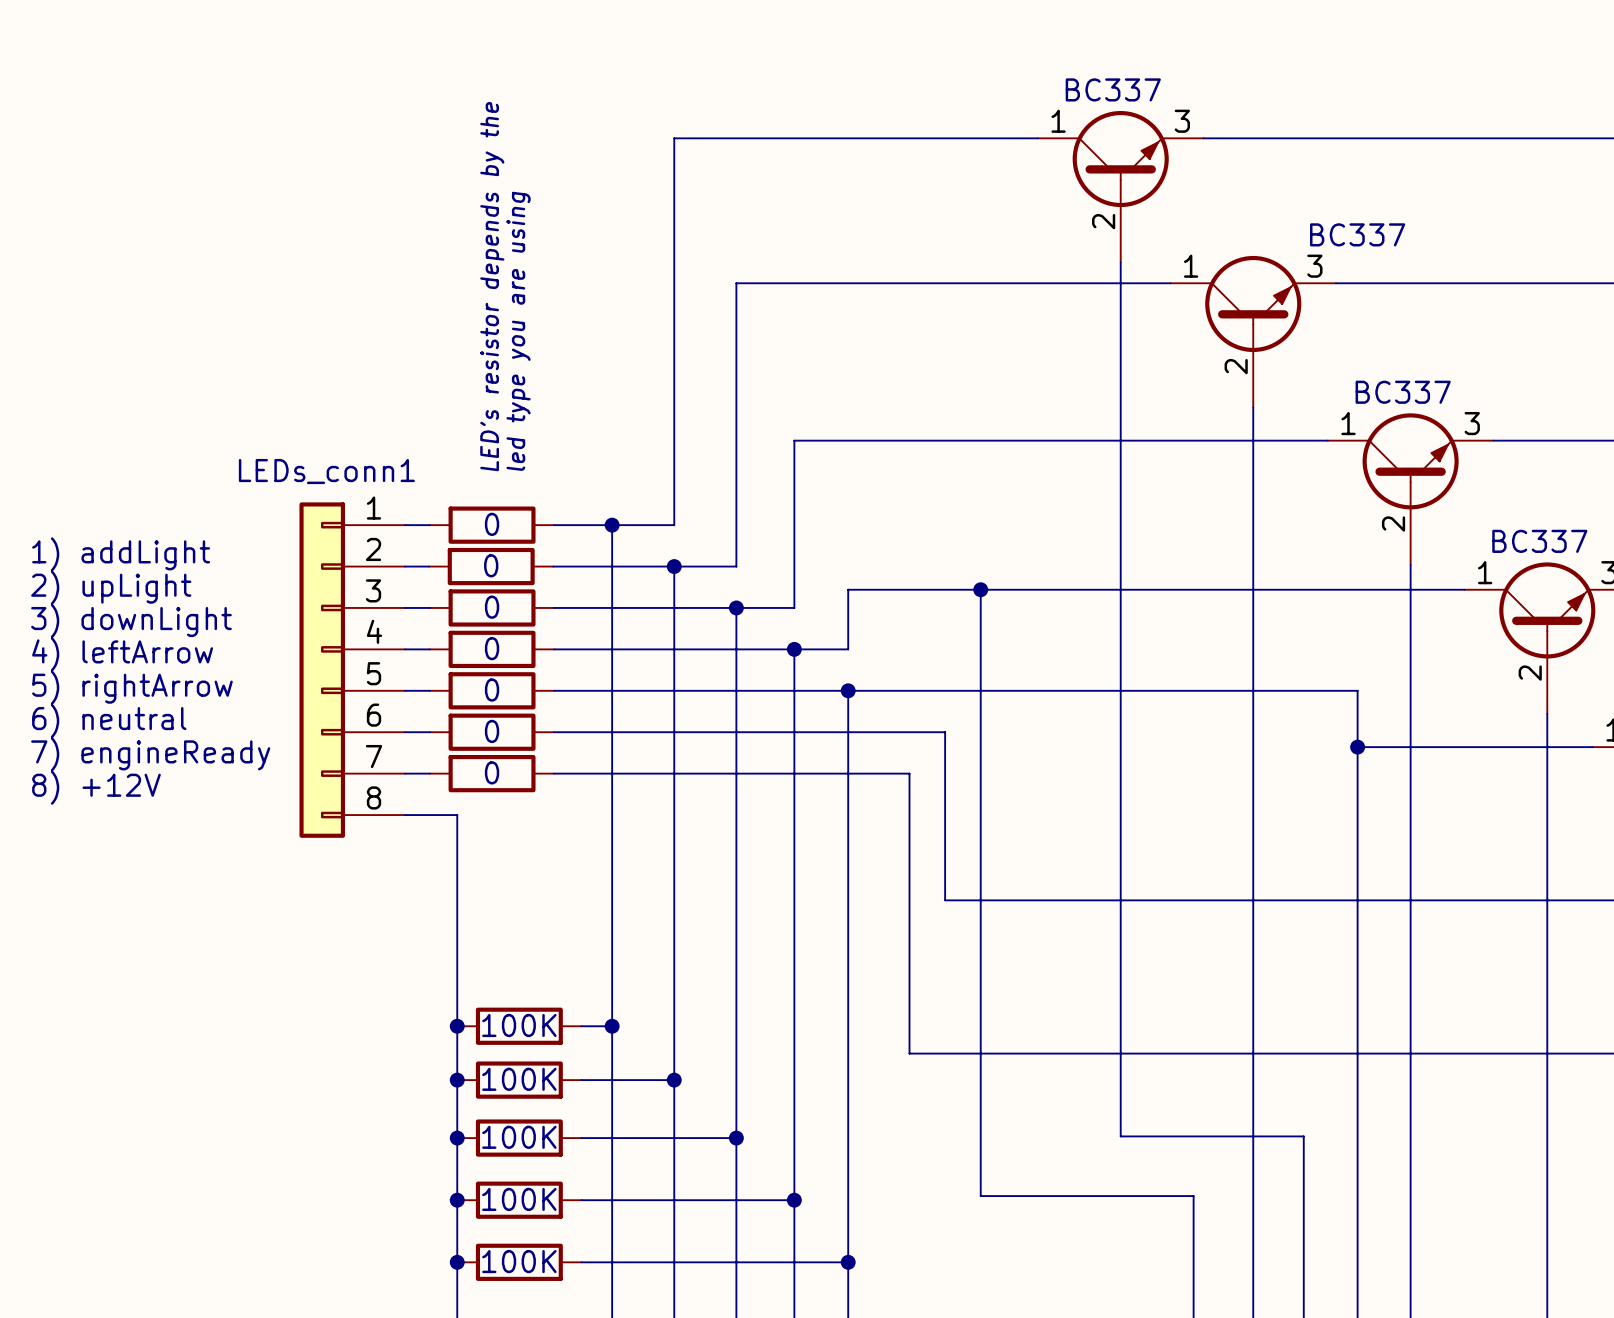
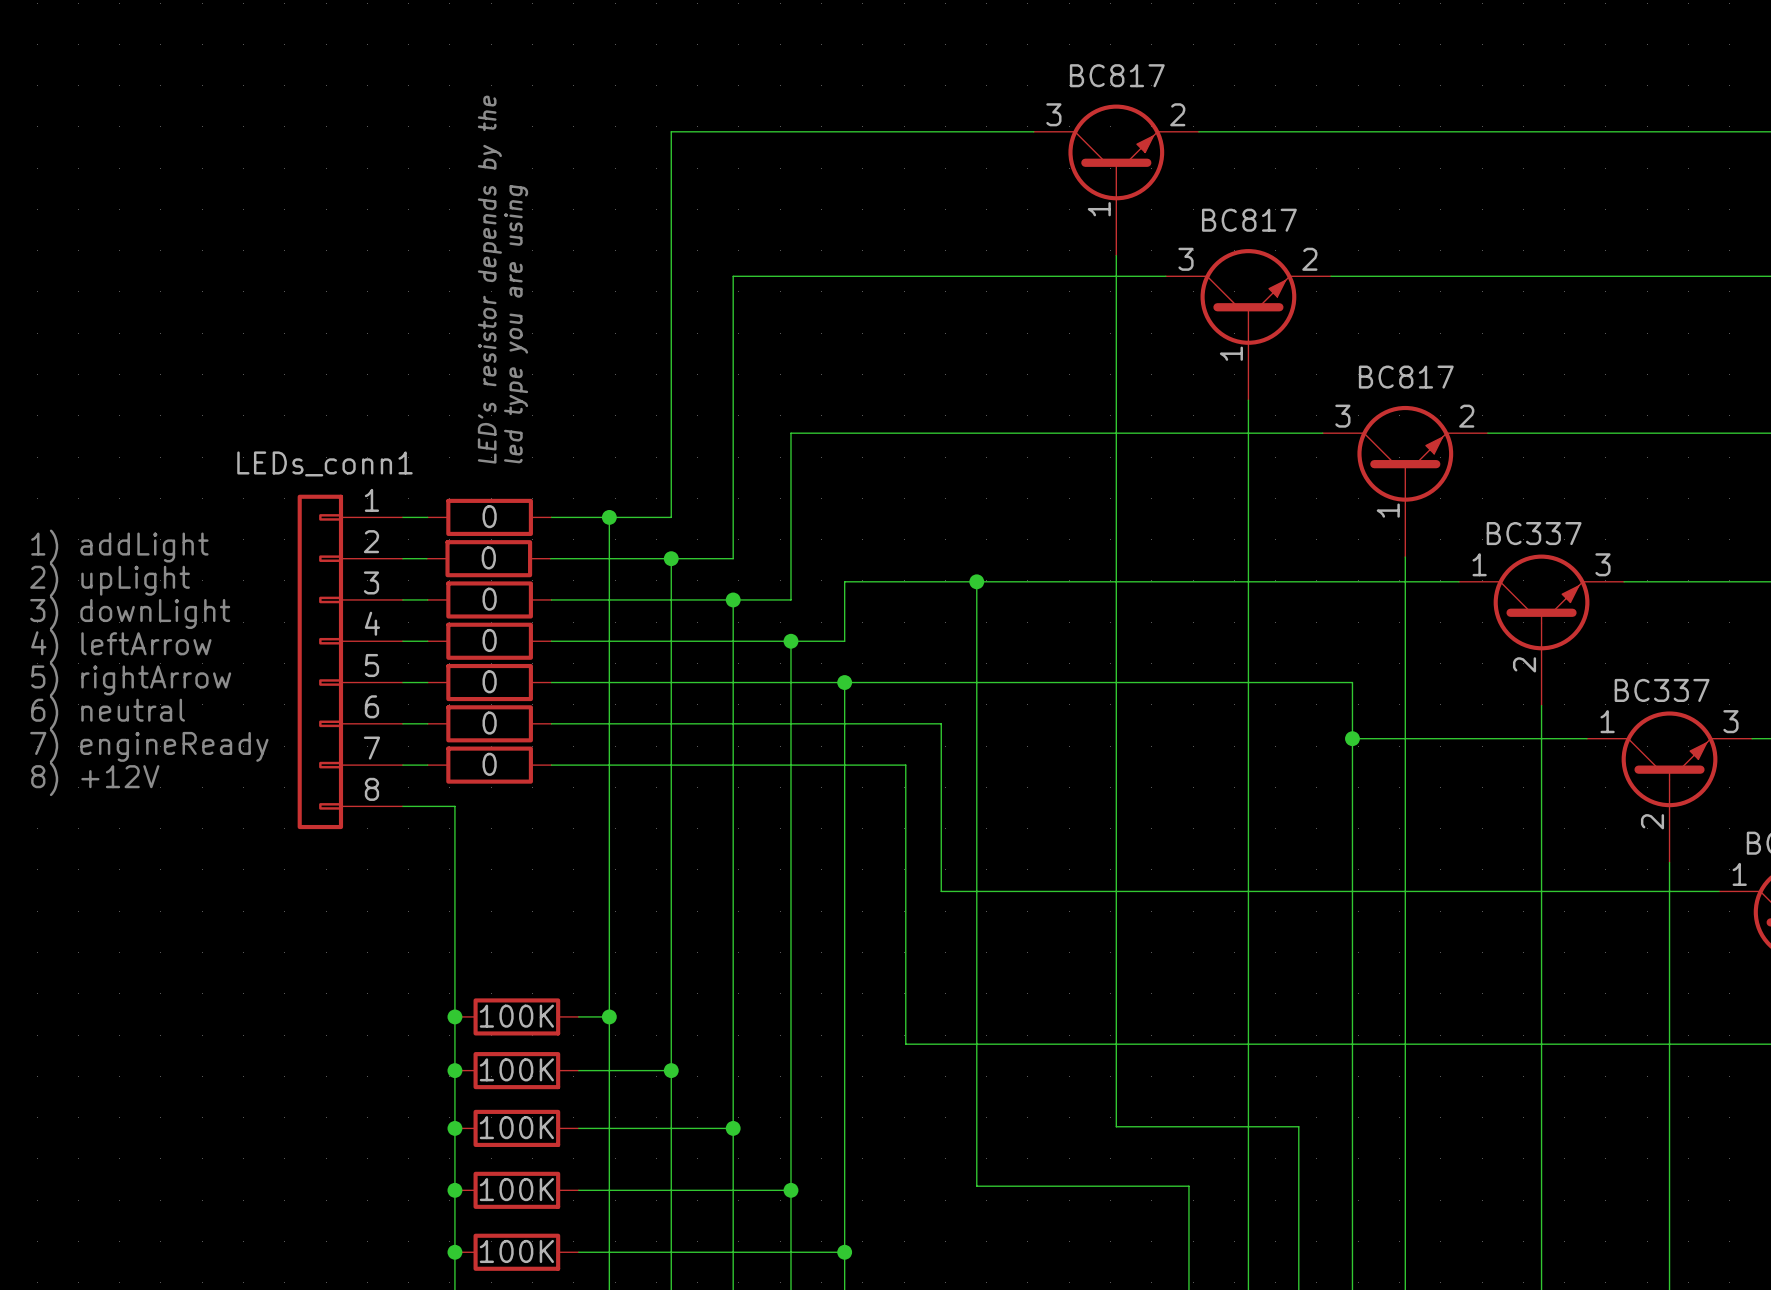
part value: BC337 (1113, 89) -> BC817 (1117, 75)
part symbol: [1037, 110, 1204, 263] -> [1033, 104, 1199, 256]
part value: BC337 (1357, 234) -> BC817 (1249, 220)
part symbol: [1170, 255, 1337, 408] -> [1165, 249, 1331, 401]
part value: BC337 (1403, 392) -> BC817 (1406, 377)
part symbol: [1327, 413, 1494, 565] -> [1322, 405, 1488, 558]

